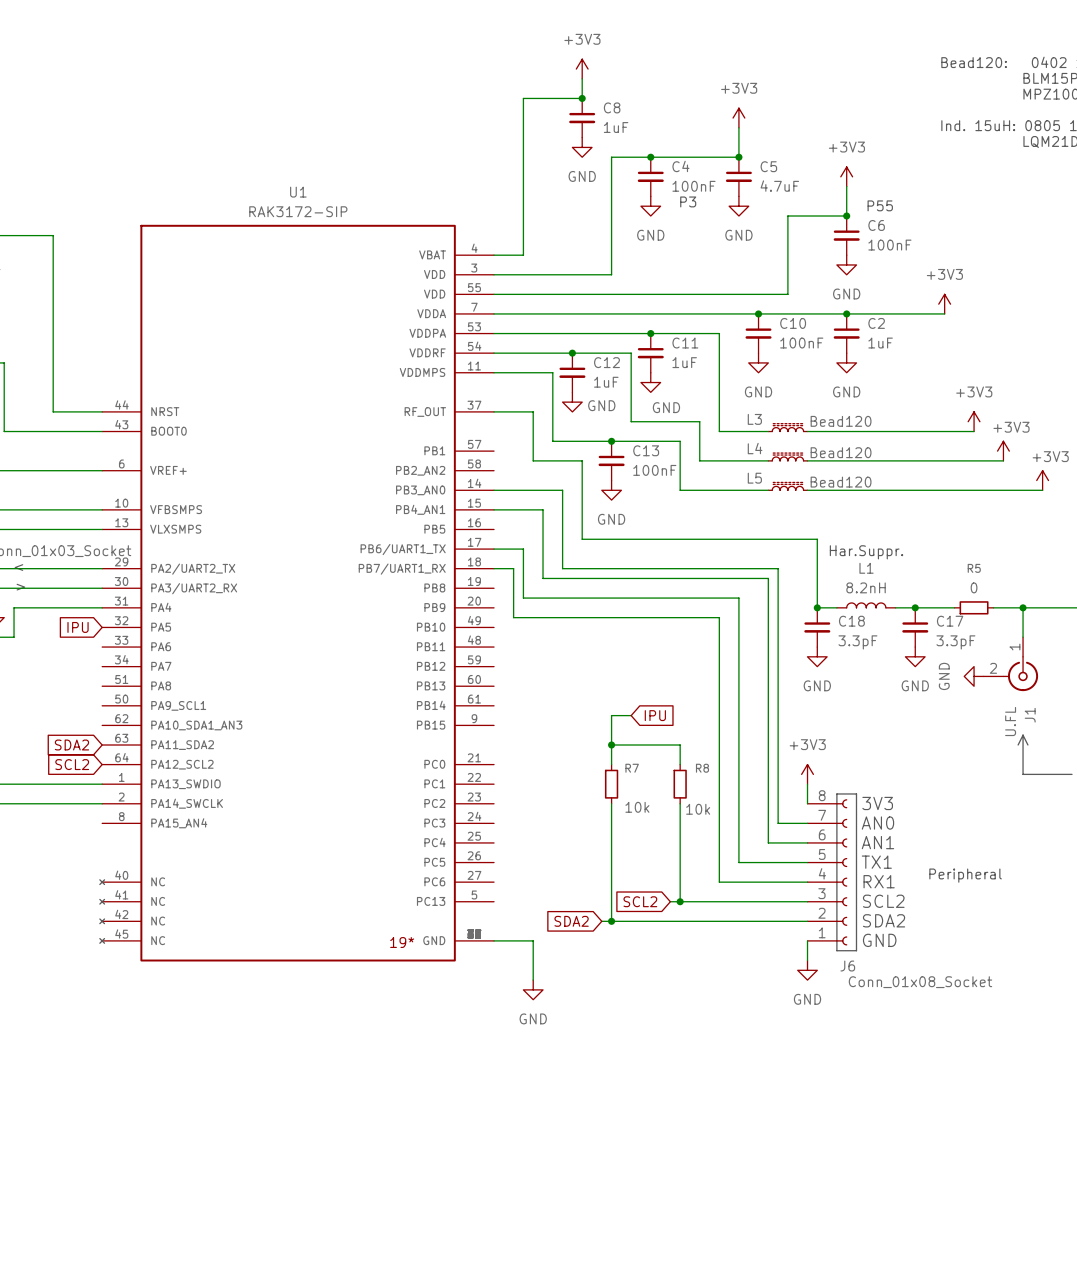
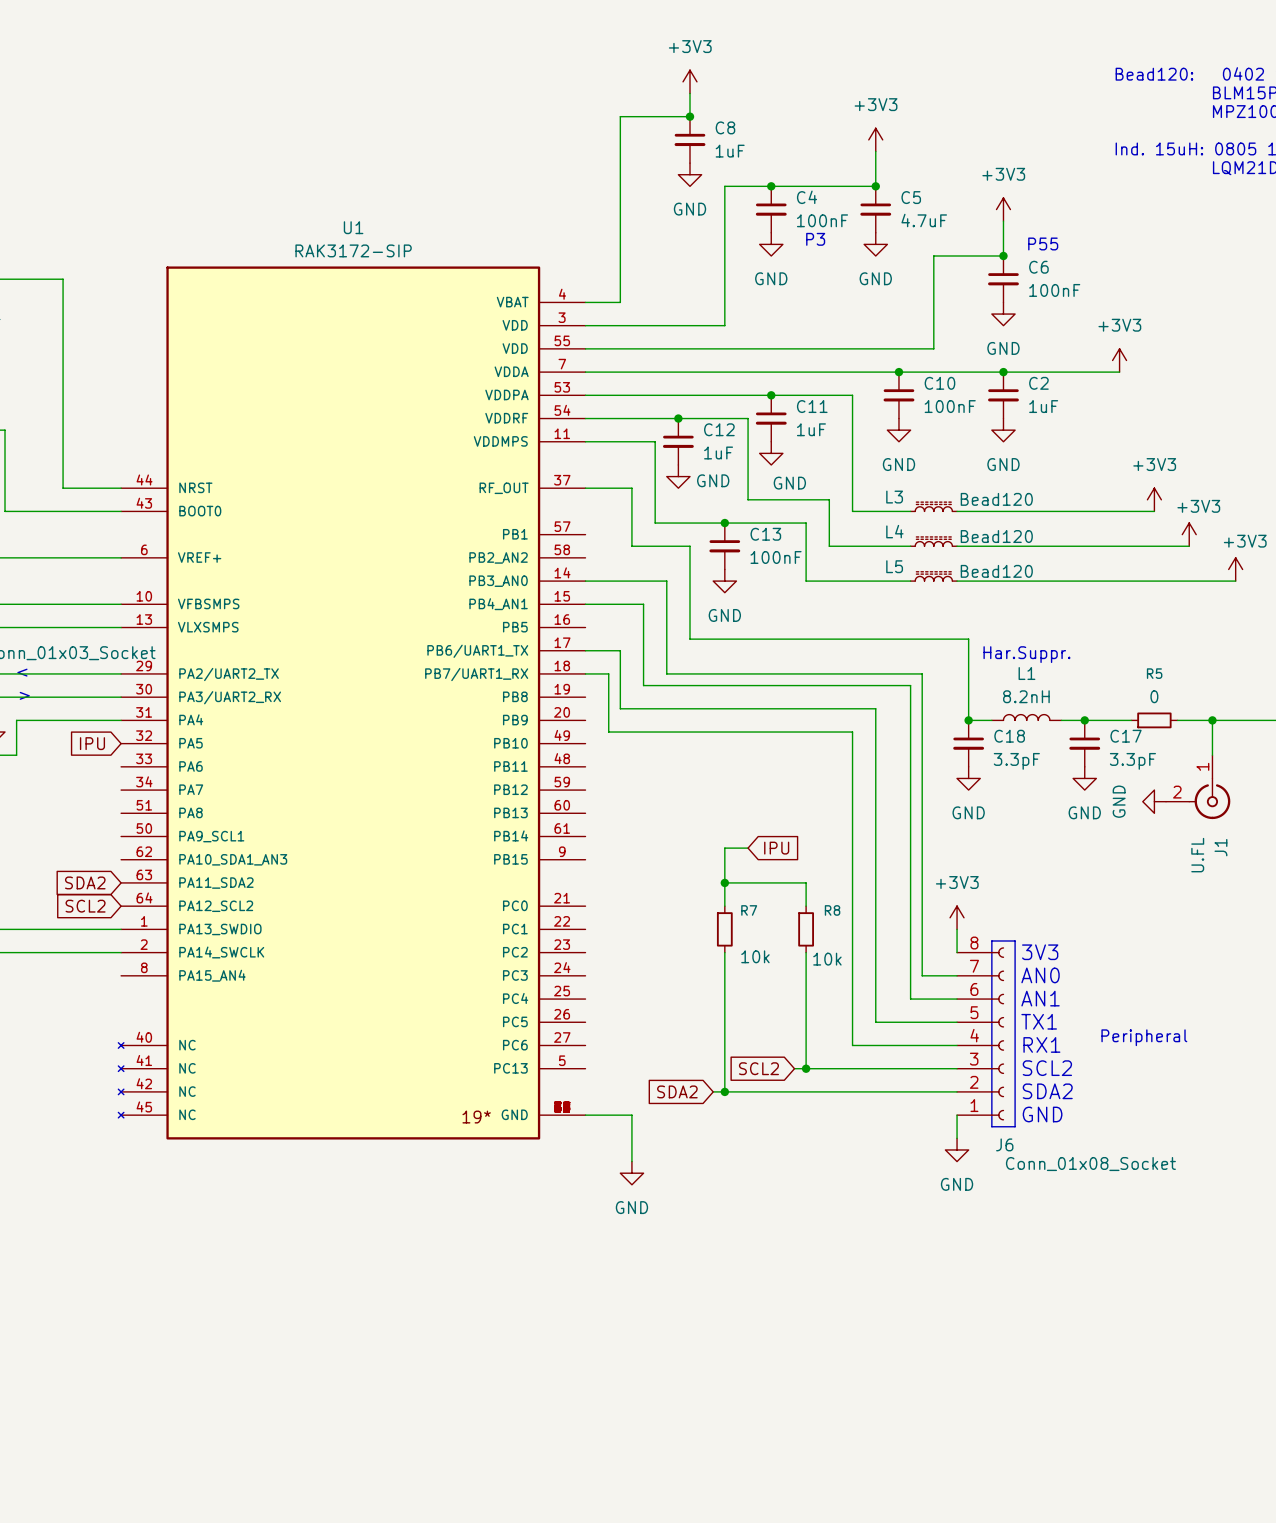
line: (1023, 735) (1023, 774) (1072, 774) -> none
line: (1023, 735) (1018, 745) -> none
line: (1023, 735) (1027, 745) -> none

